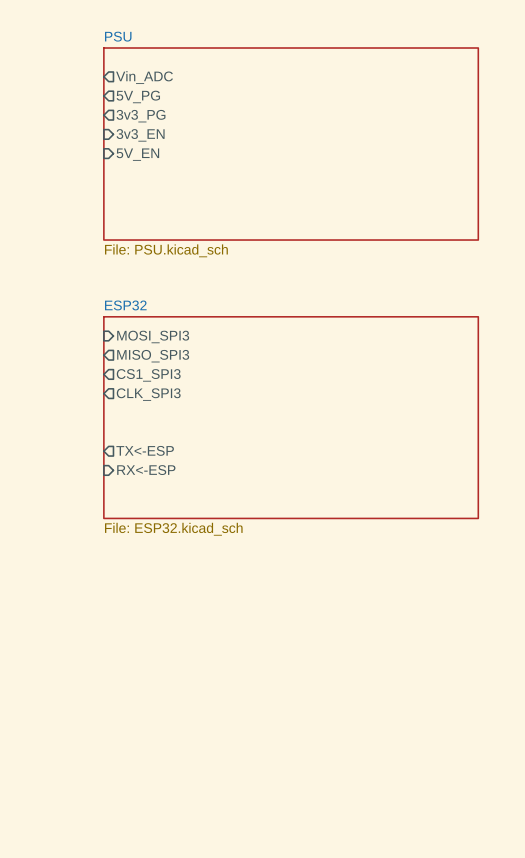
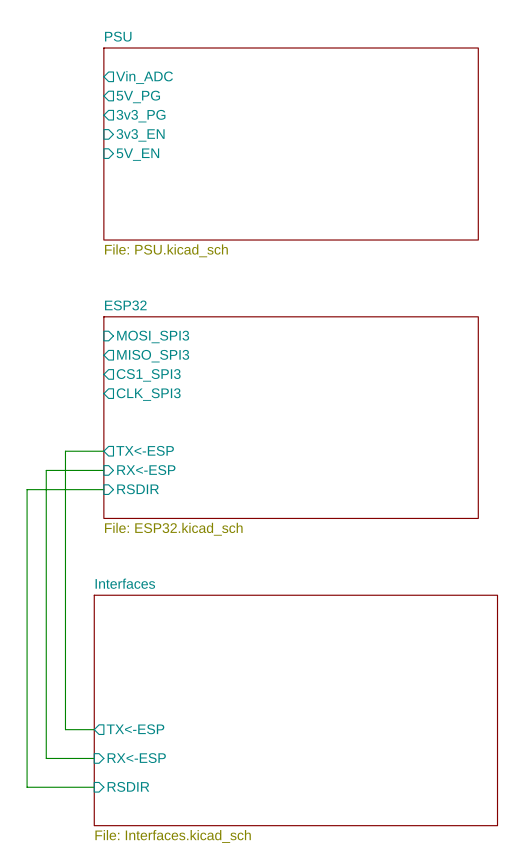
wire: none -> (103, 451) (65, 451) (65, 729) (94, 729)
wire: none -> (103, 470) (46, 470) (46, 758) (94, 758)
wire: none -> (103, 489) (27, 489) (27, 787) (94, 787)
sheet pin: none -> RSDIR (138, 489)
sheet Interfaces: none -> File: Interfaces.kicad_sch (295, 710)
sheet pin: none -> TX<-ESP (135, 729)
sheet pin: none -> RX<-ESP (136, 758)
sheet pin: none -> RSDIR (128, 786)

